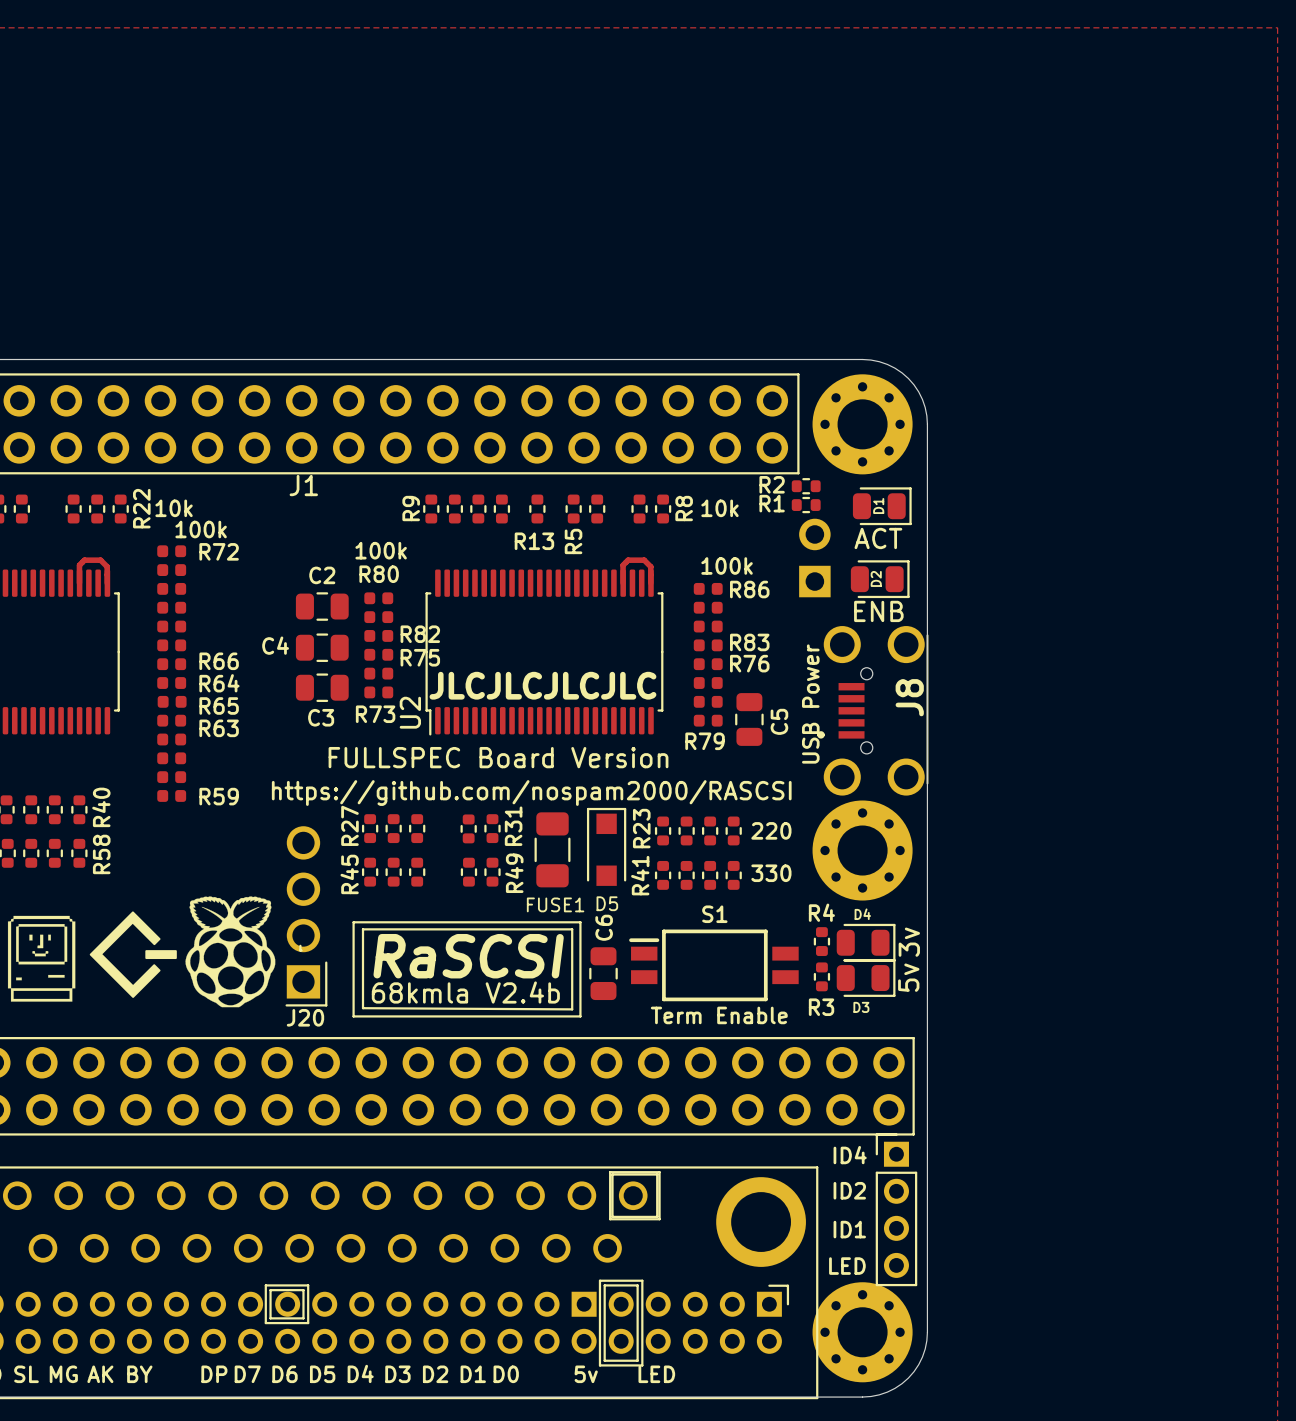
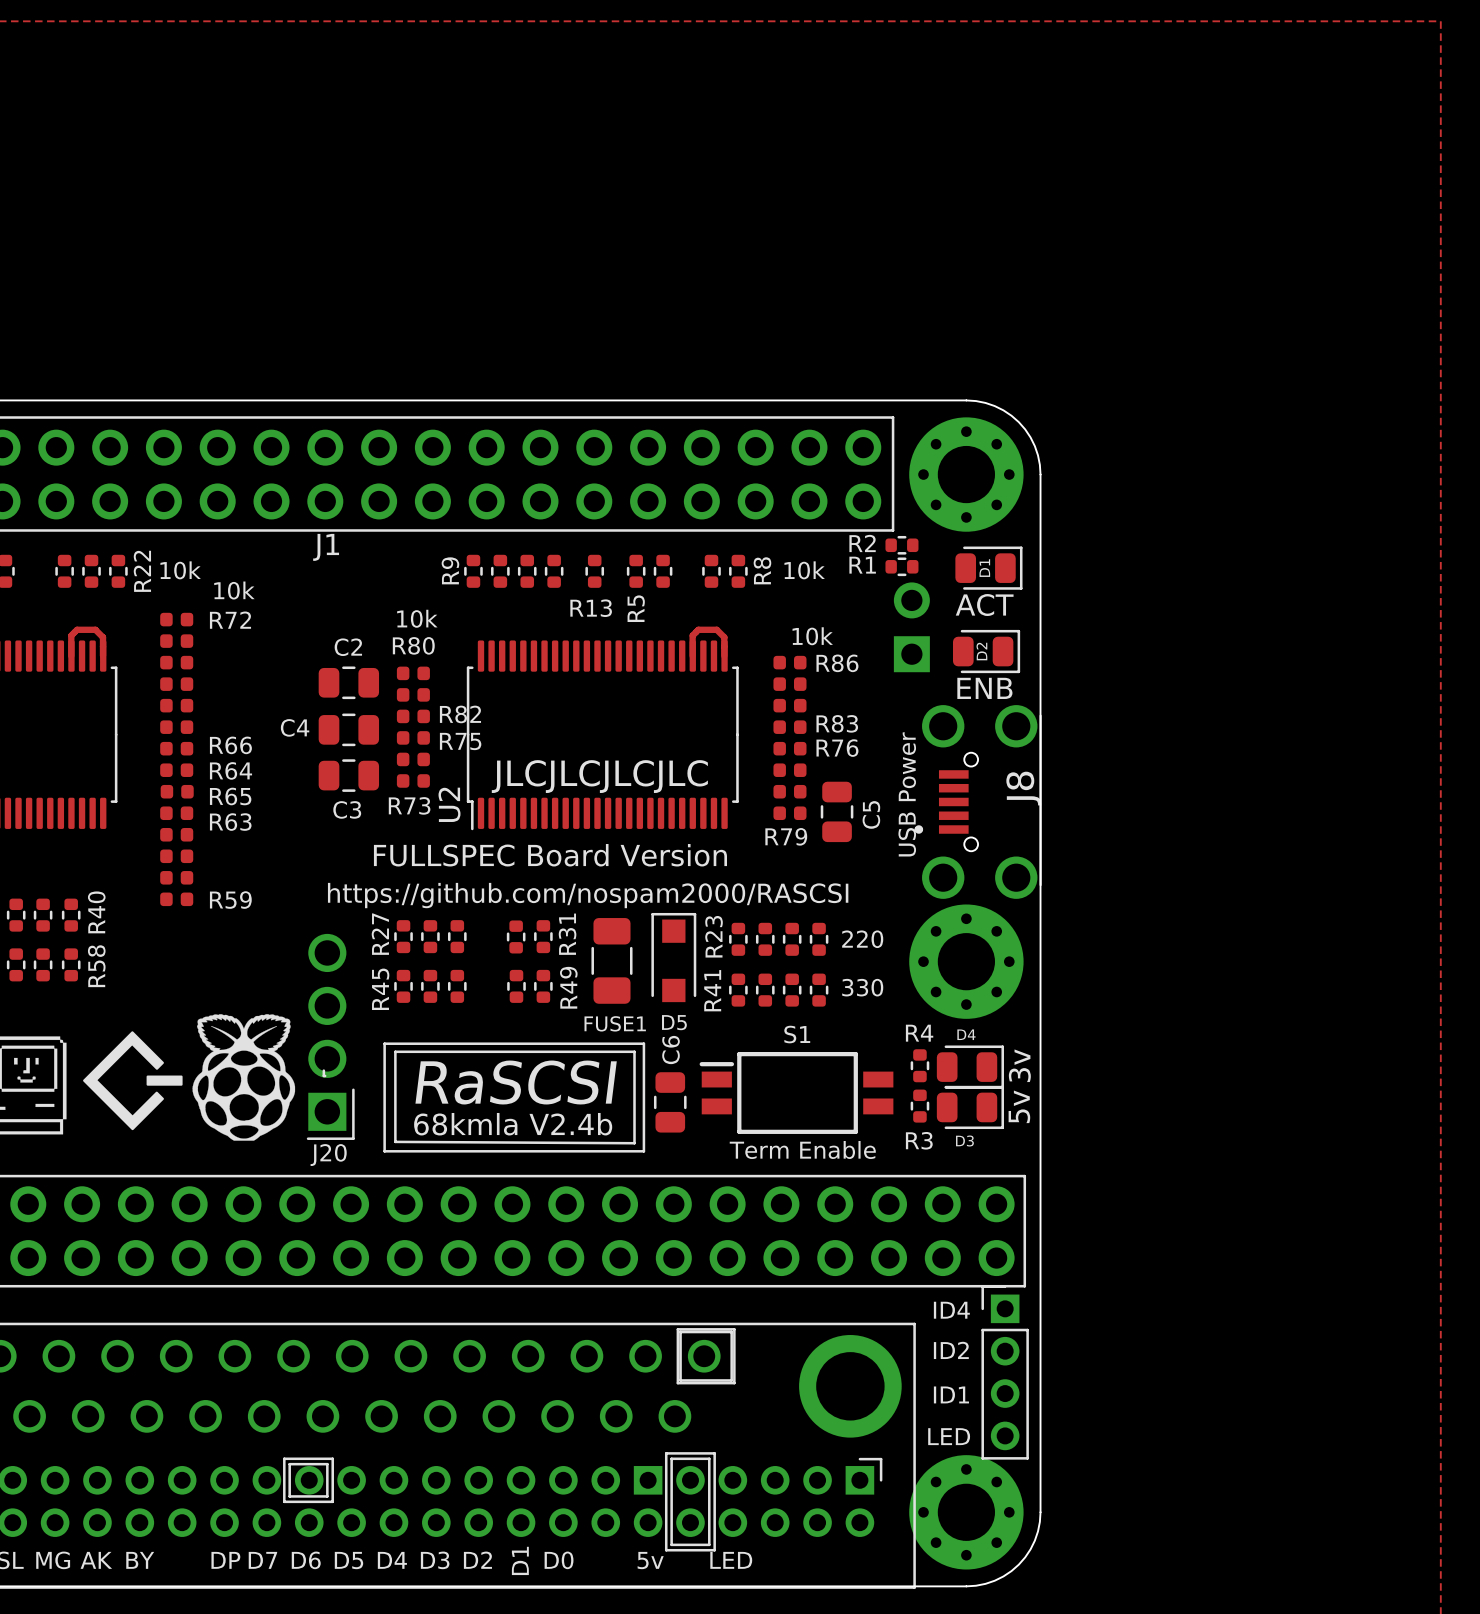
text: 100k (201, 529) -> 10k (234, 590)
text: 100k (381, 550) -> 10k (417, 618)
text: 100k (727, 565) -> 10k (812, 636)
text rotation: 0° (473, 1374) -> 90° counterclockwise (520, 1560)

